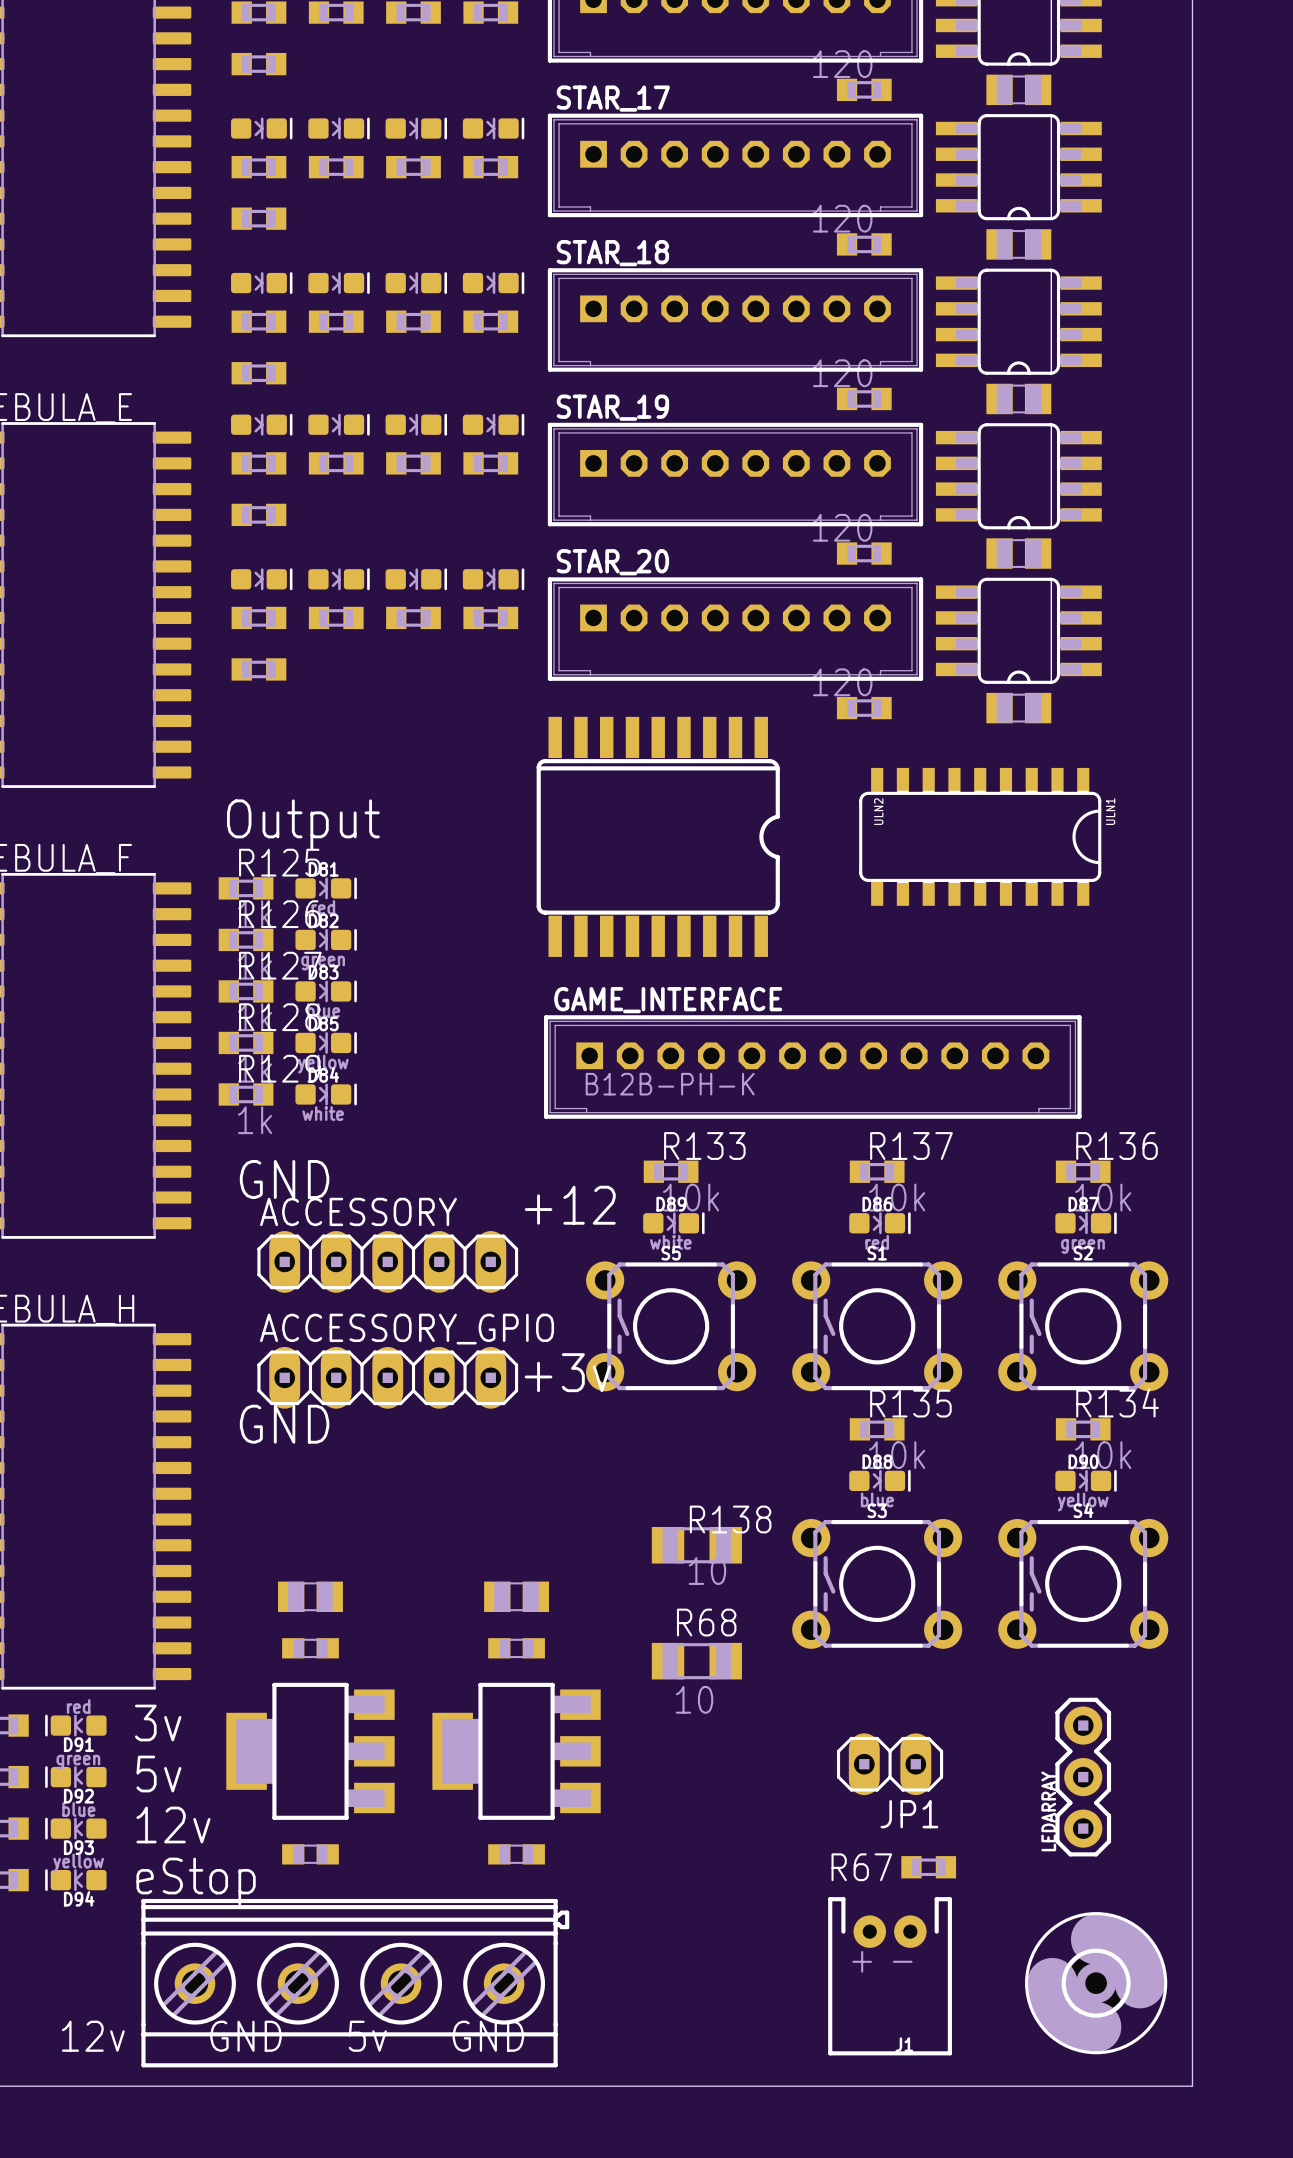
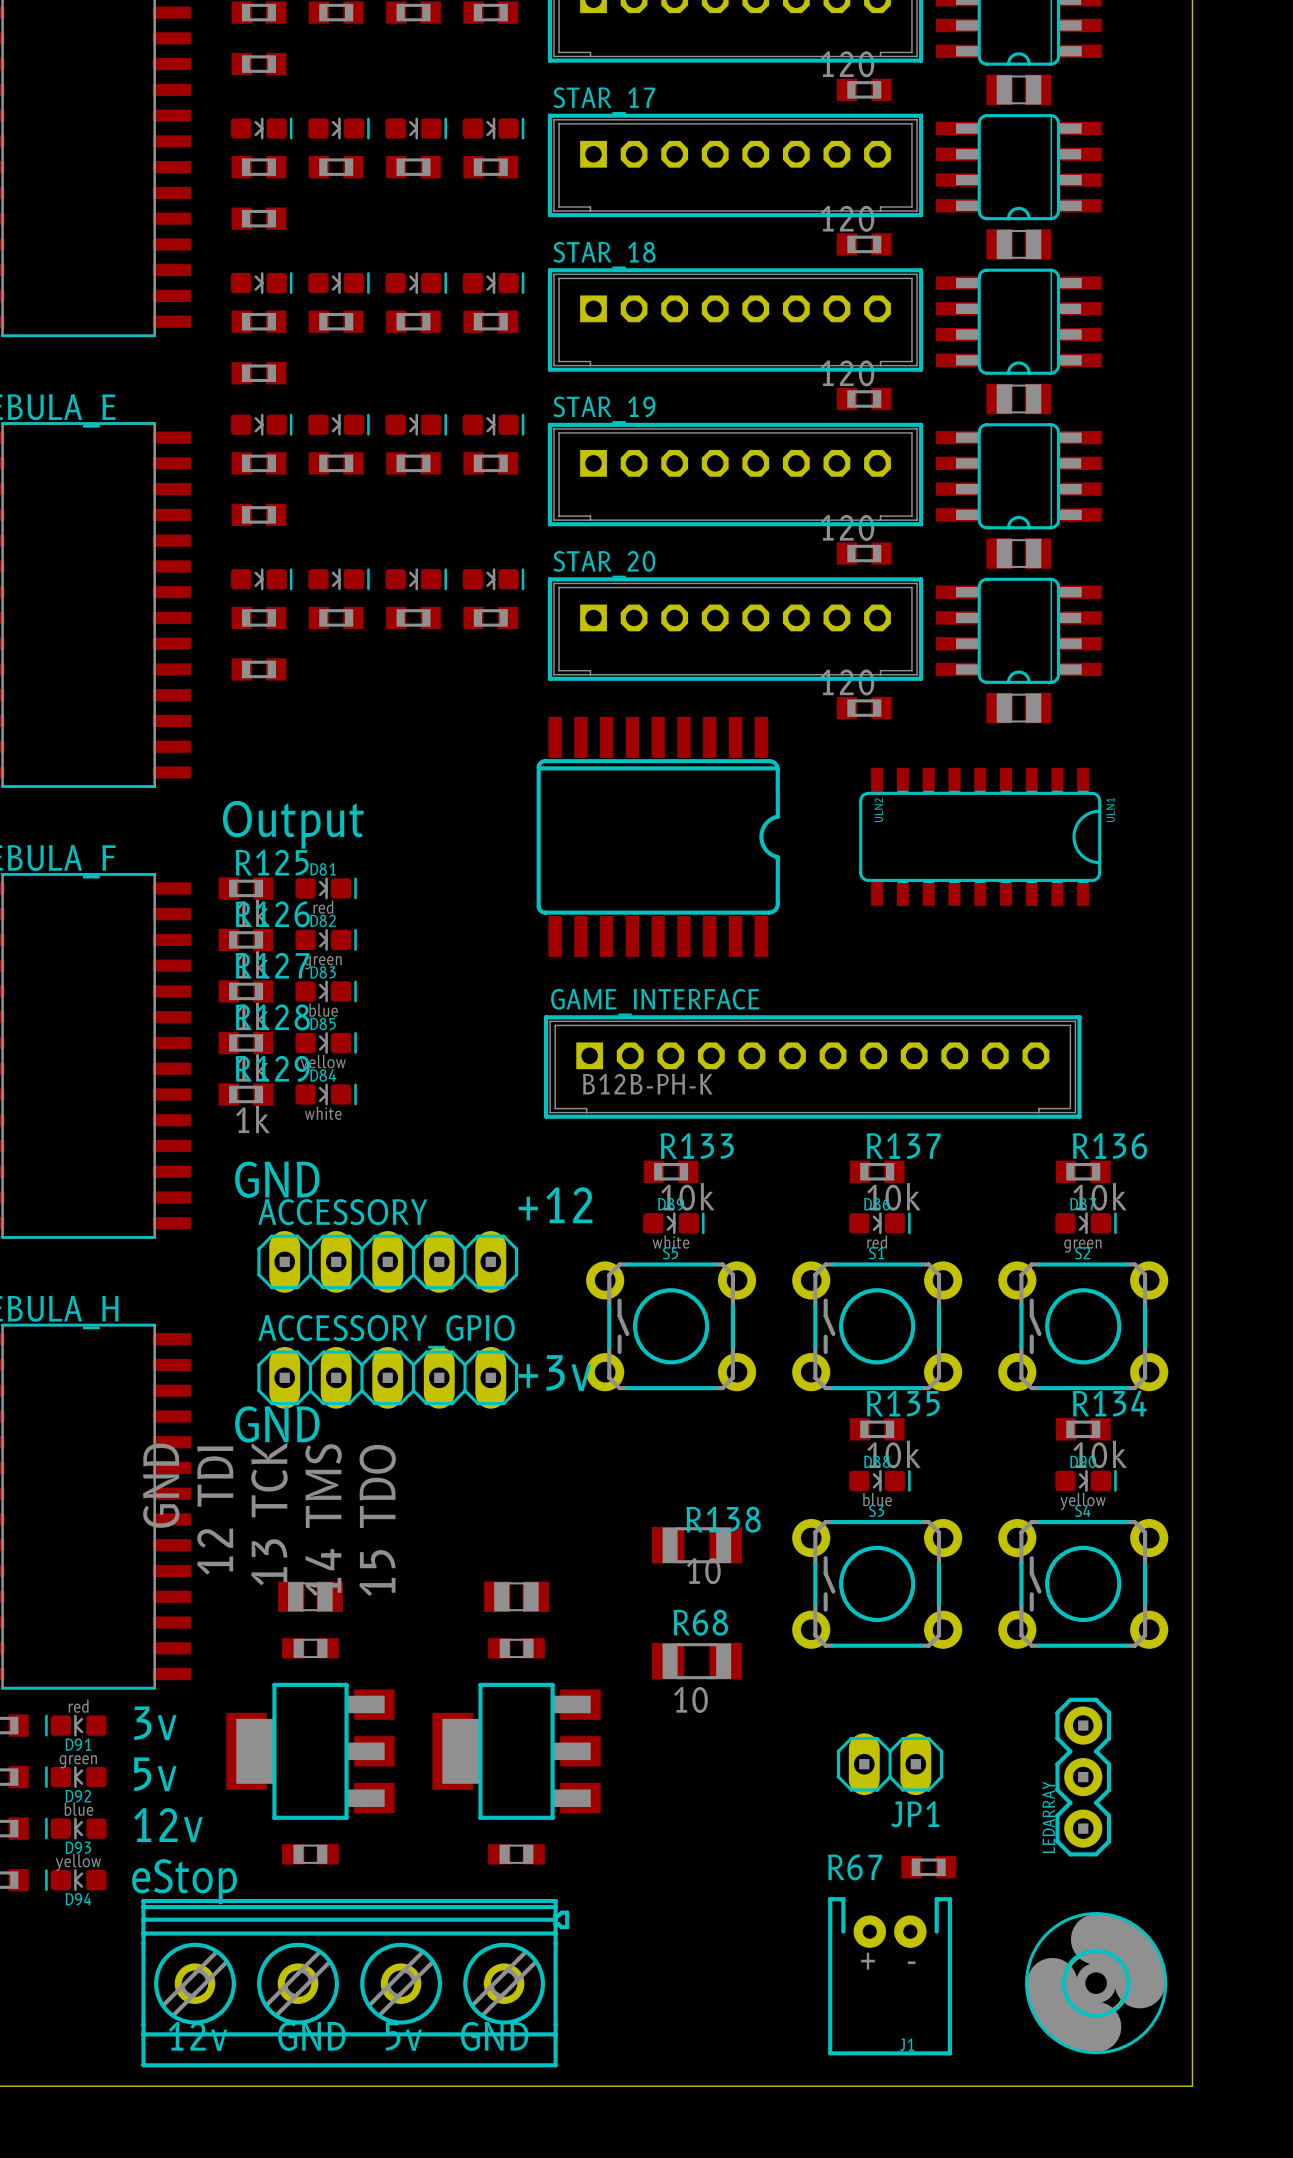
text: none -> GND (161, 1485)
text: none -> 12 TDI (215, 1510)
text: none -> 13 TCK (269, 1513)
text: none -> 15 TDO (377, 1520)
text: none -> 14 TMS (323, 1520)

